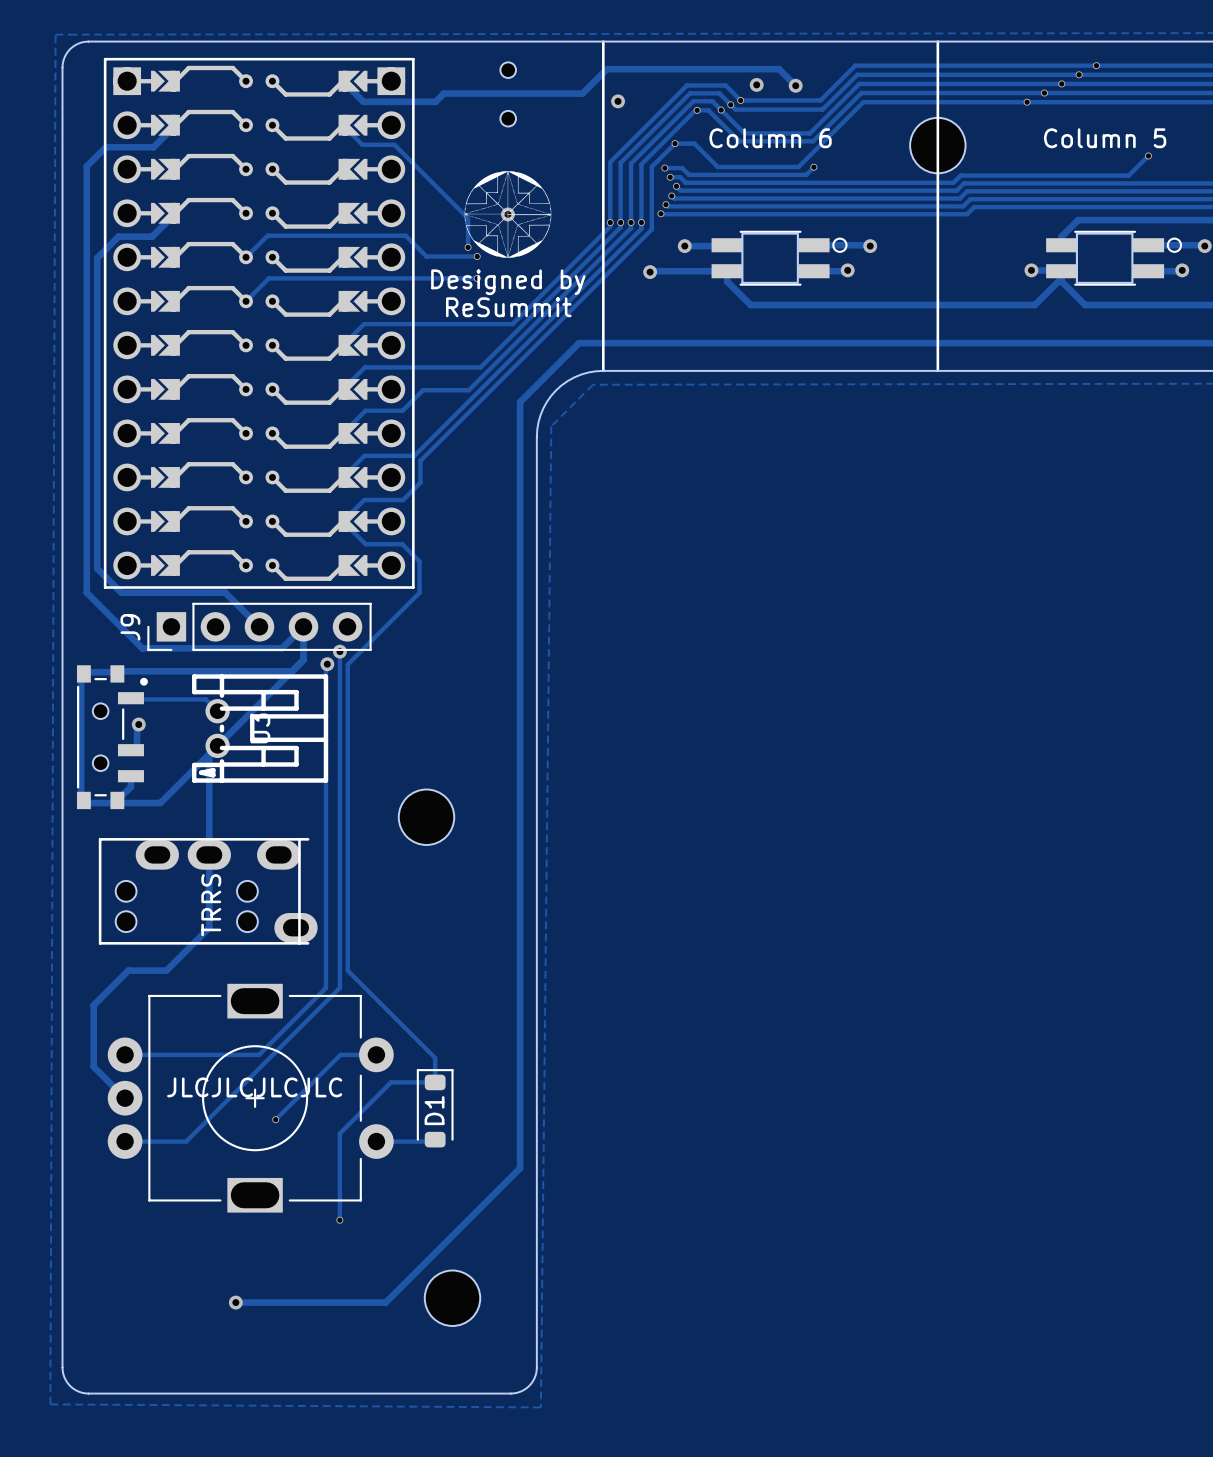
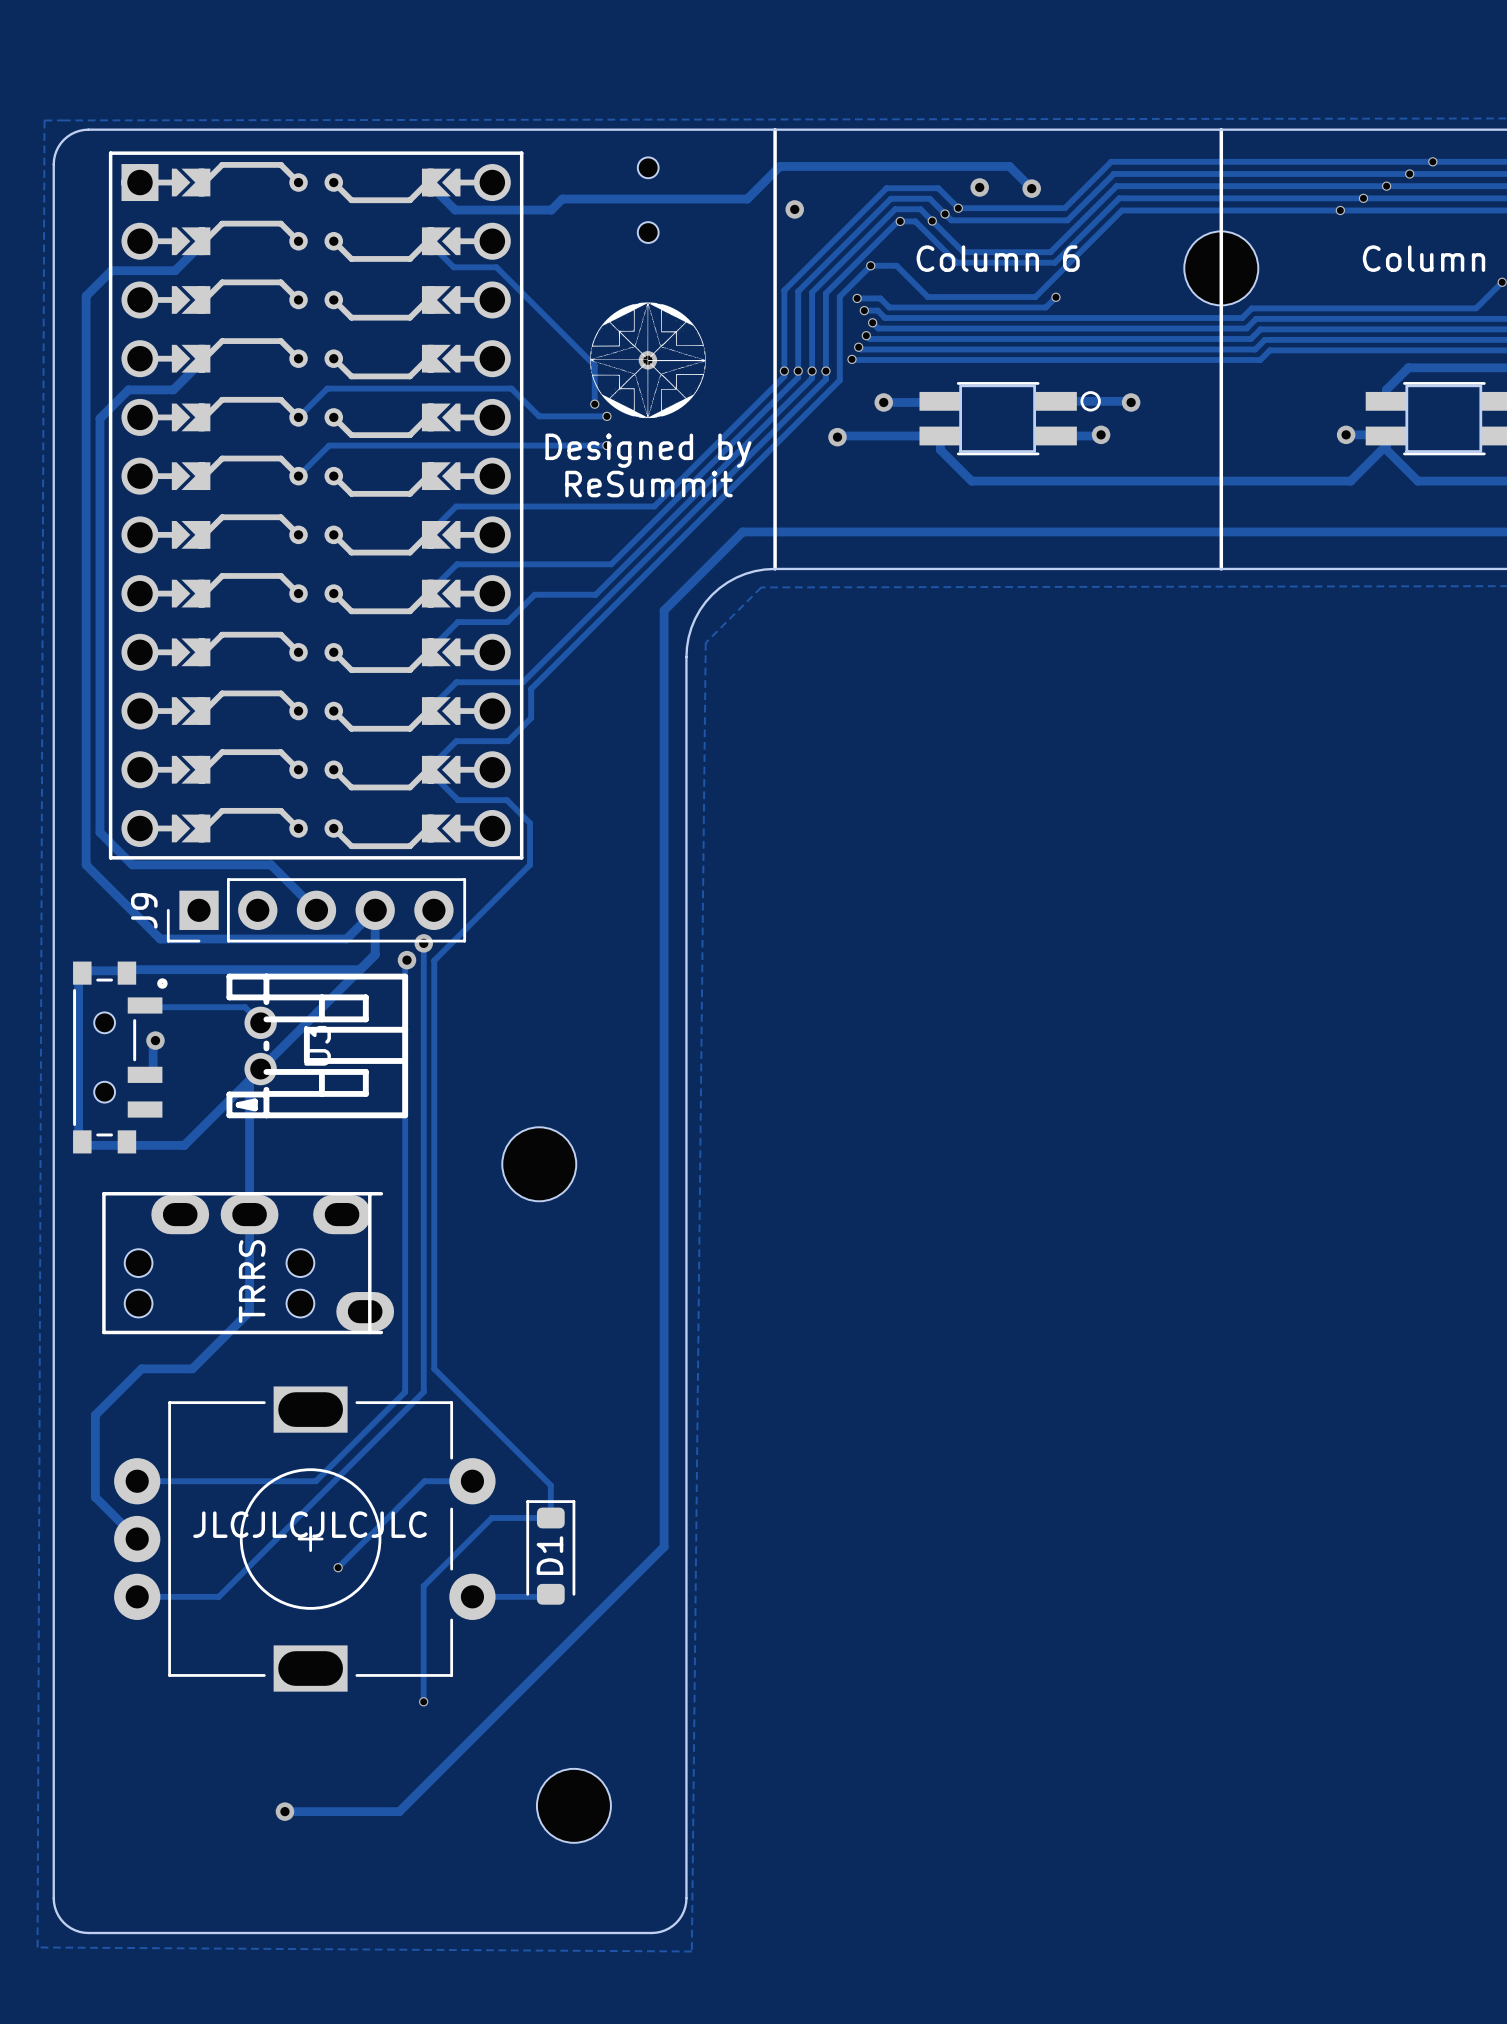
part footprint: [103, 57, 415, 589] -> [108, 151, 524, 860]
track: (130, 776) (130, 786) (117, 800) -> none
track: (520, 1104) (520, 1168) (385, 1302) (321, 1302) -> (664, 1546) (399, 1811)

